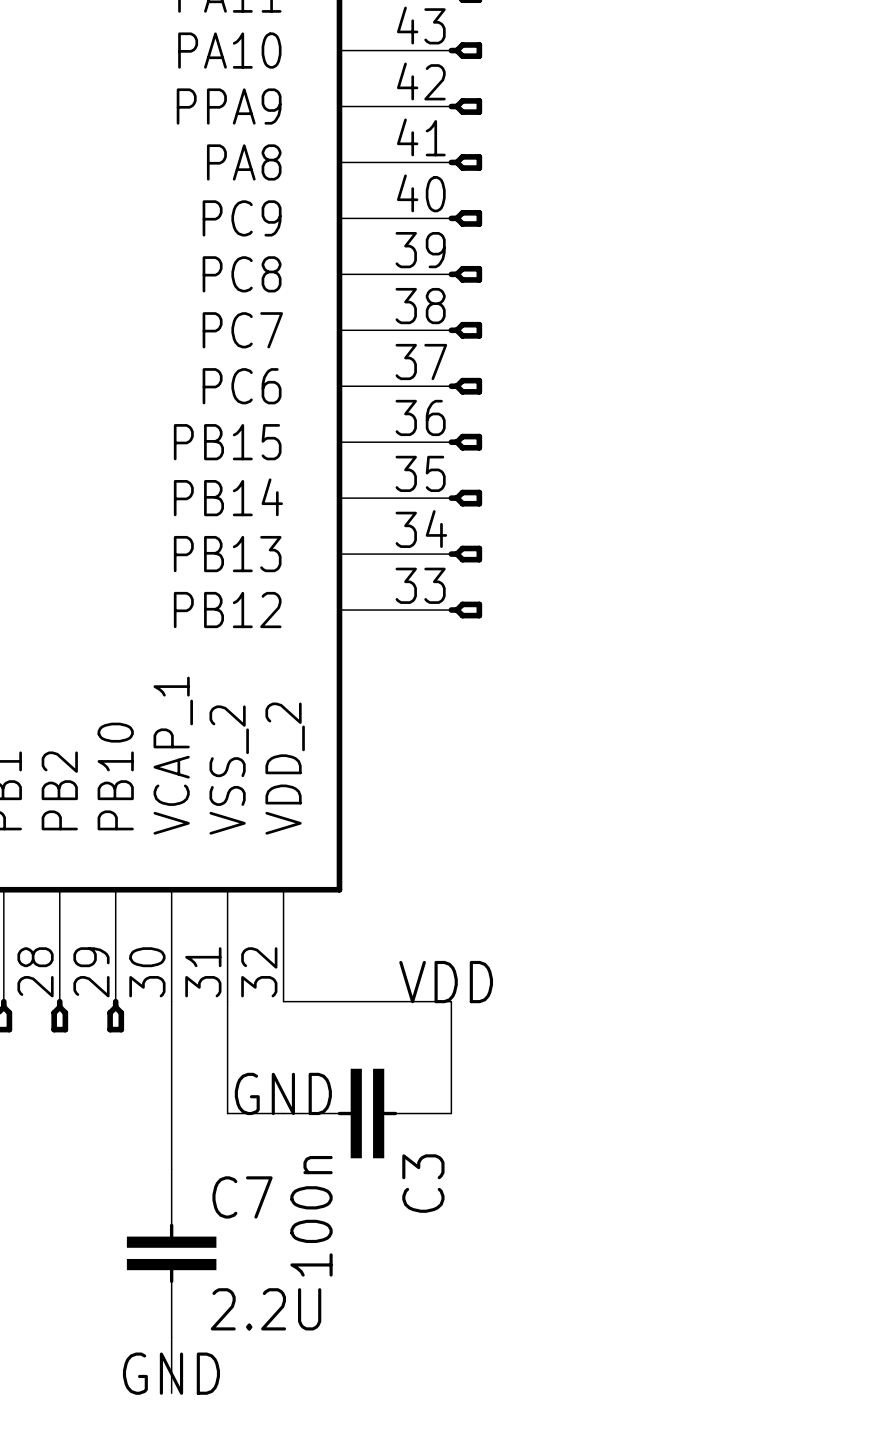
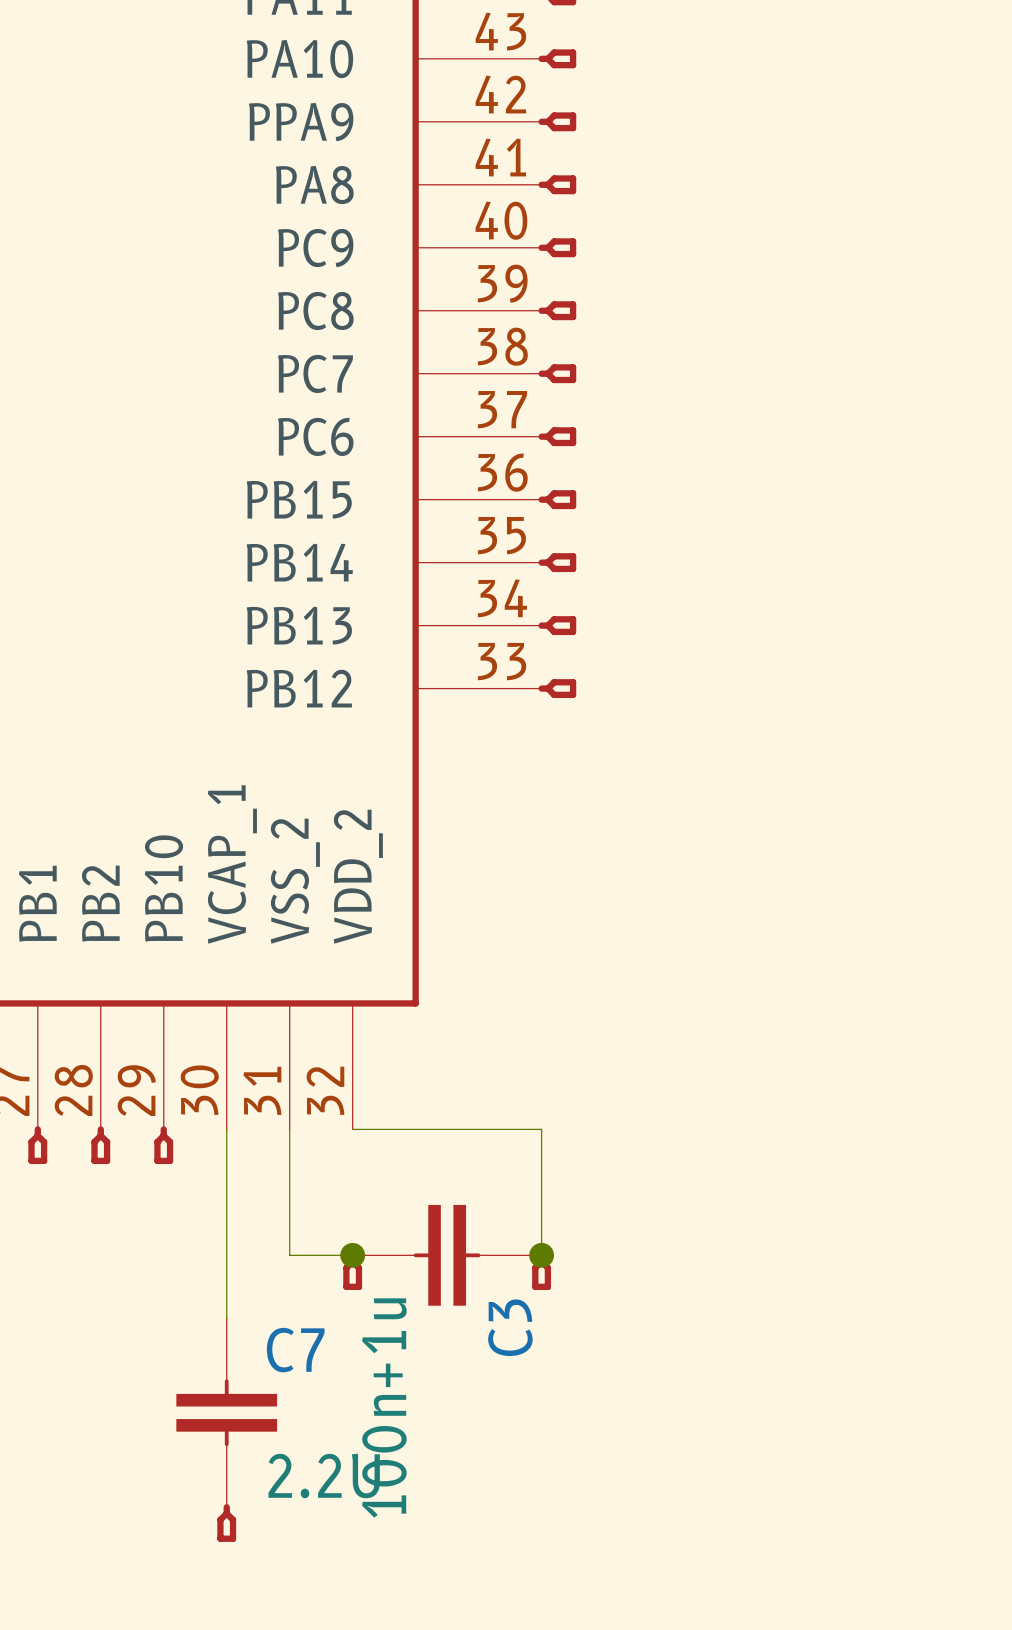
label: VDD (446, 982) -> none
label: GND (283, 1093) -> none
junction: none -> (352, 1255)
junction: none -> (541, 1255)
part: none -> (352, 1271)
part: none -> (541, 1271)
C3 value: 100n (311, 1216) -> 100n+1u (384, 1408)
wire: (171, 1337) (171, 1393) -> none
part: none -> (226, 1522)
label: GND (171, 1373) -> none

